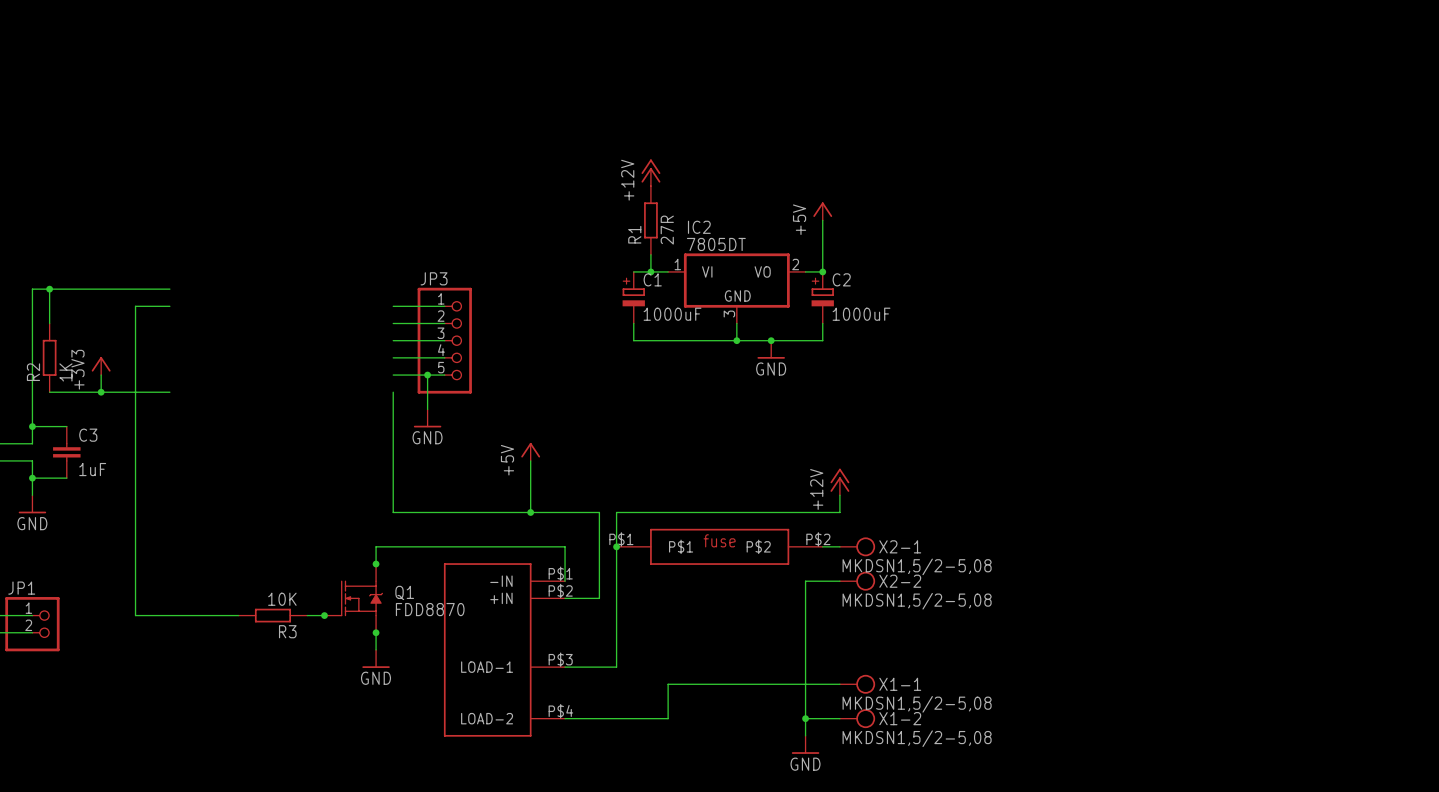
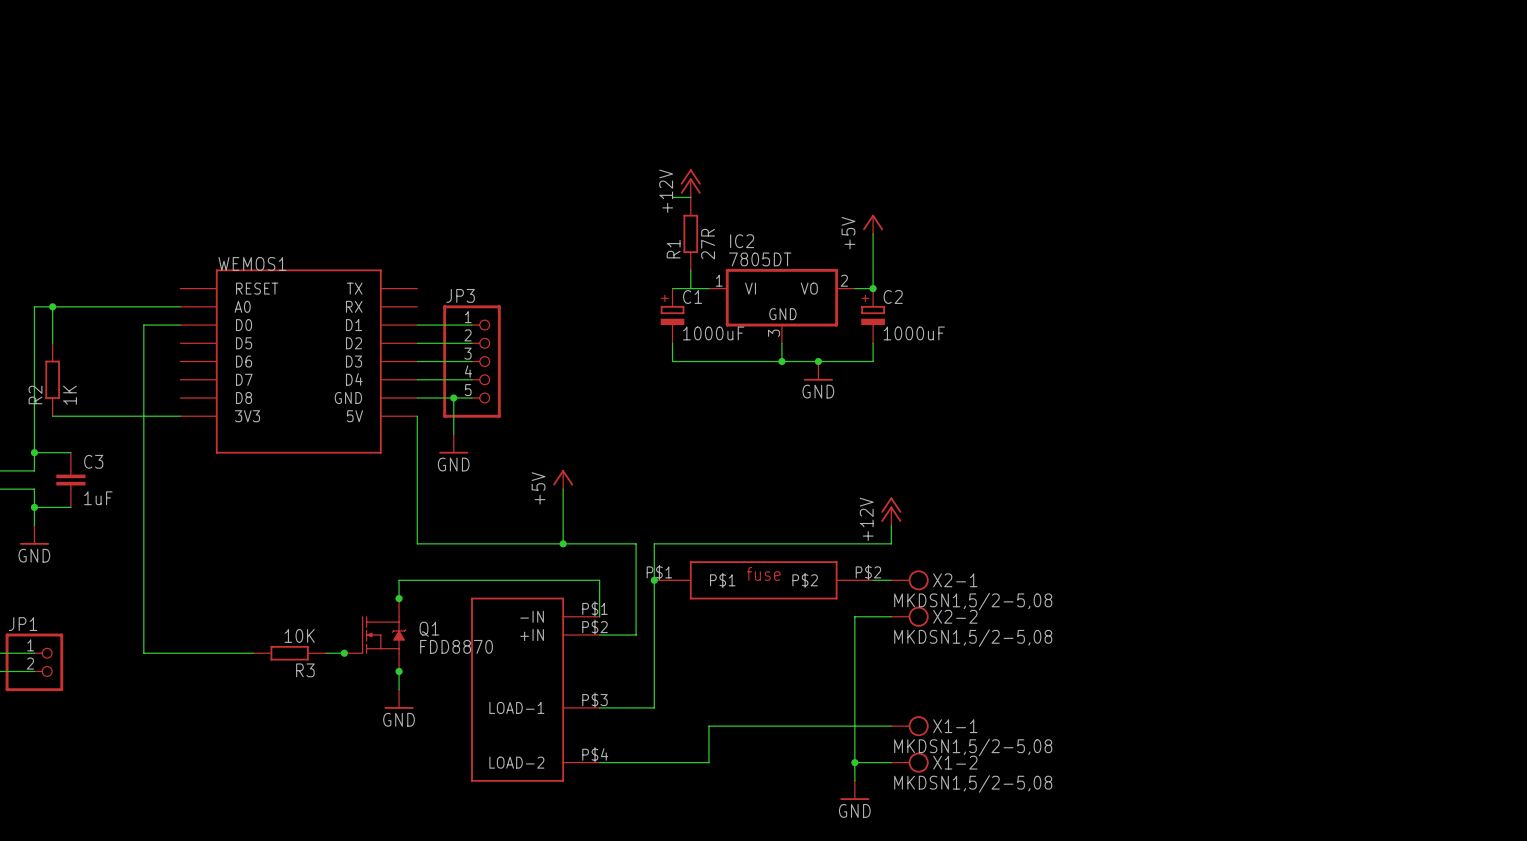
wire: none -> (672, 197) (690, 197)
junction: (650, 271) -> none
WEMOS1: none -> (298, 361)
power symbol: +3V3 (101, 366) -> none
wire: (101, 375) (101, 392) -> none
junction: (101, 392) -> none

